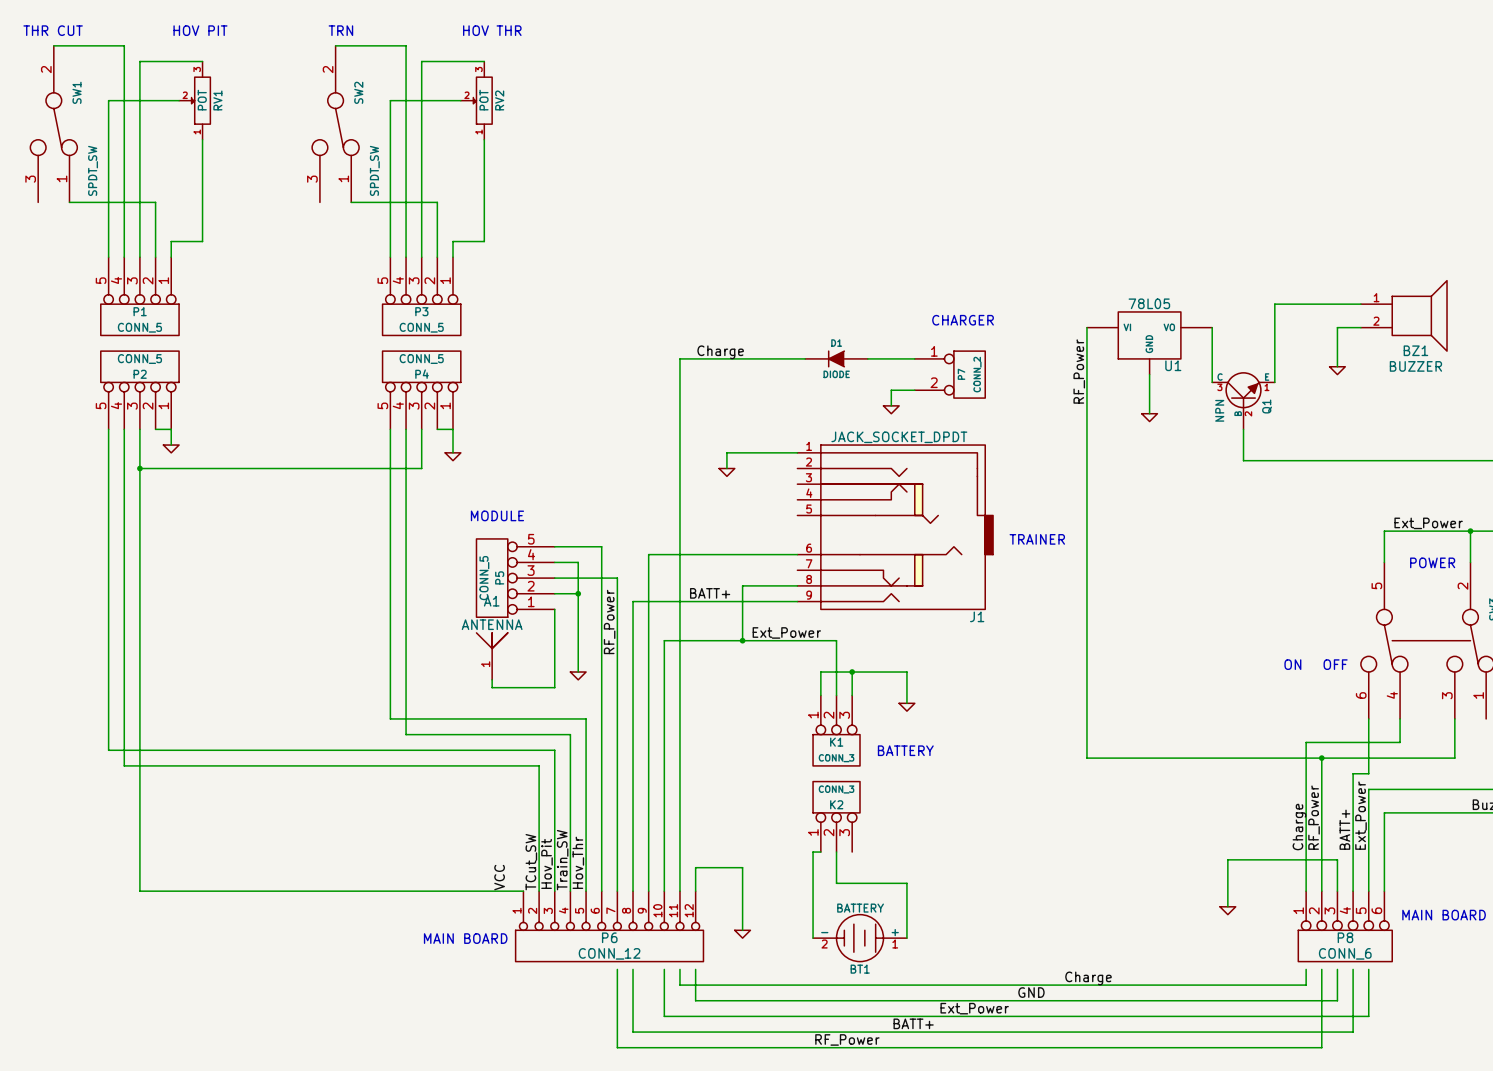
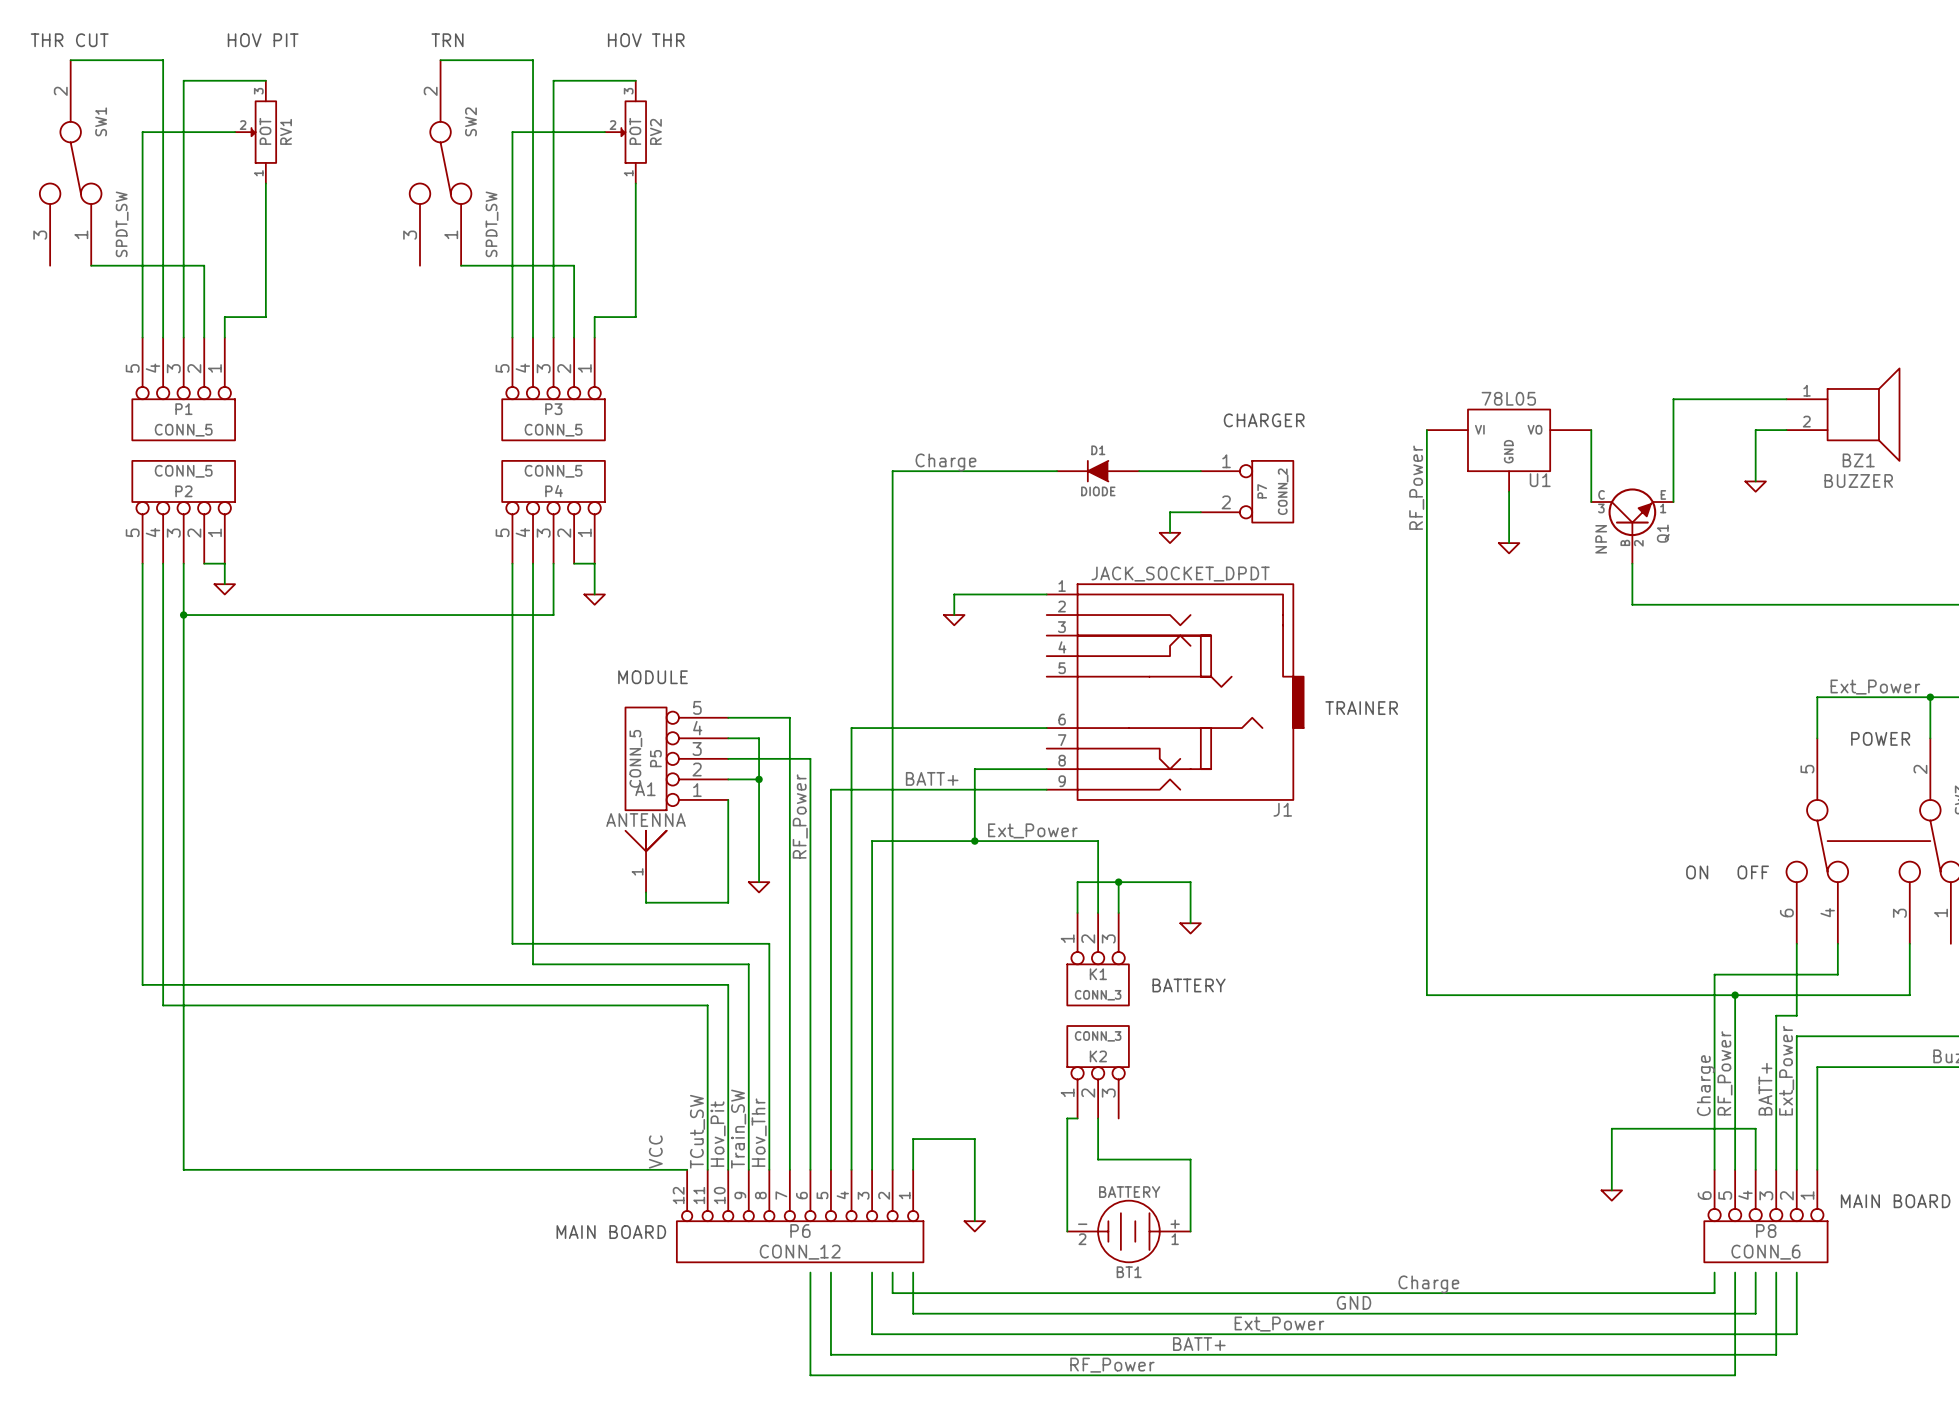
P6 flip: as is (609, 945) -> left-right (800, 1241)
P8 flip: as is (1345, 945) -> left-right (1765, 1241)

